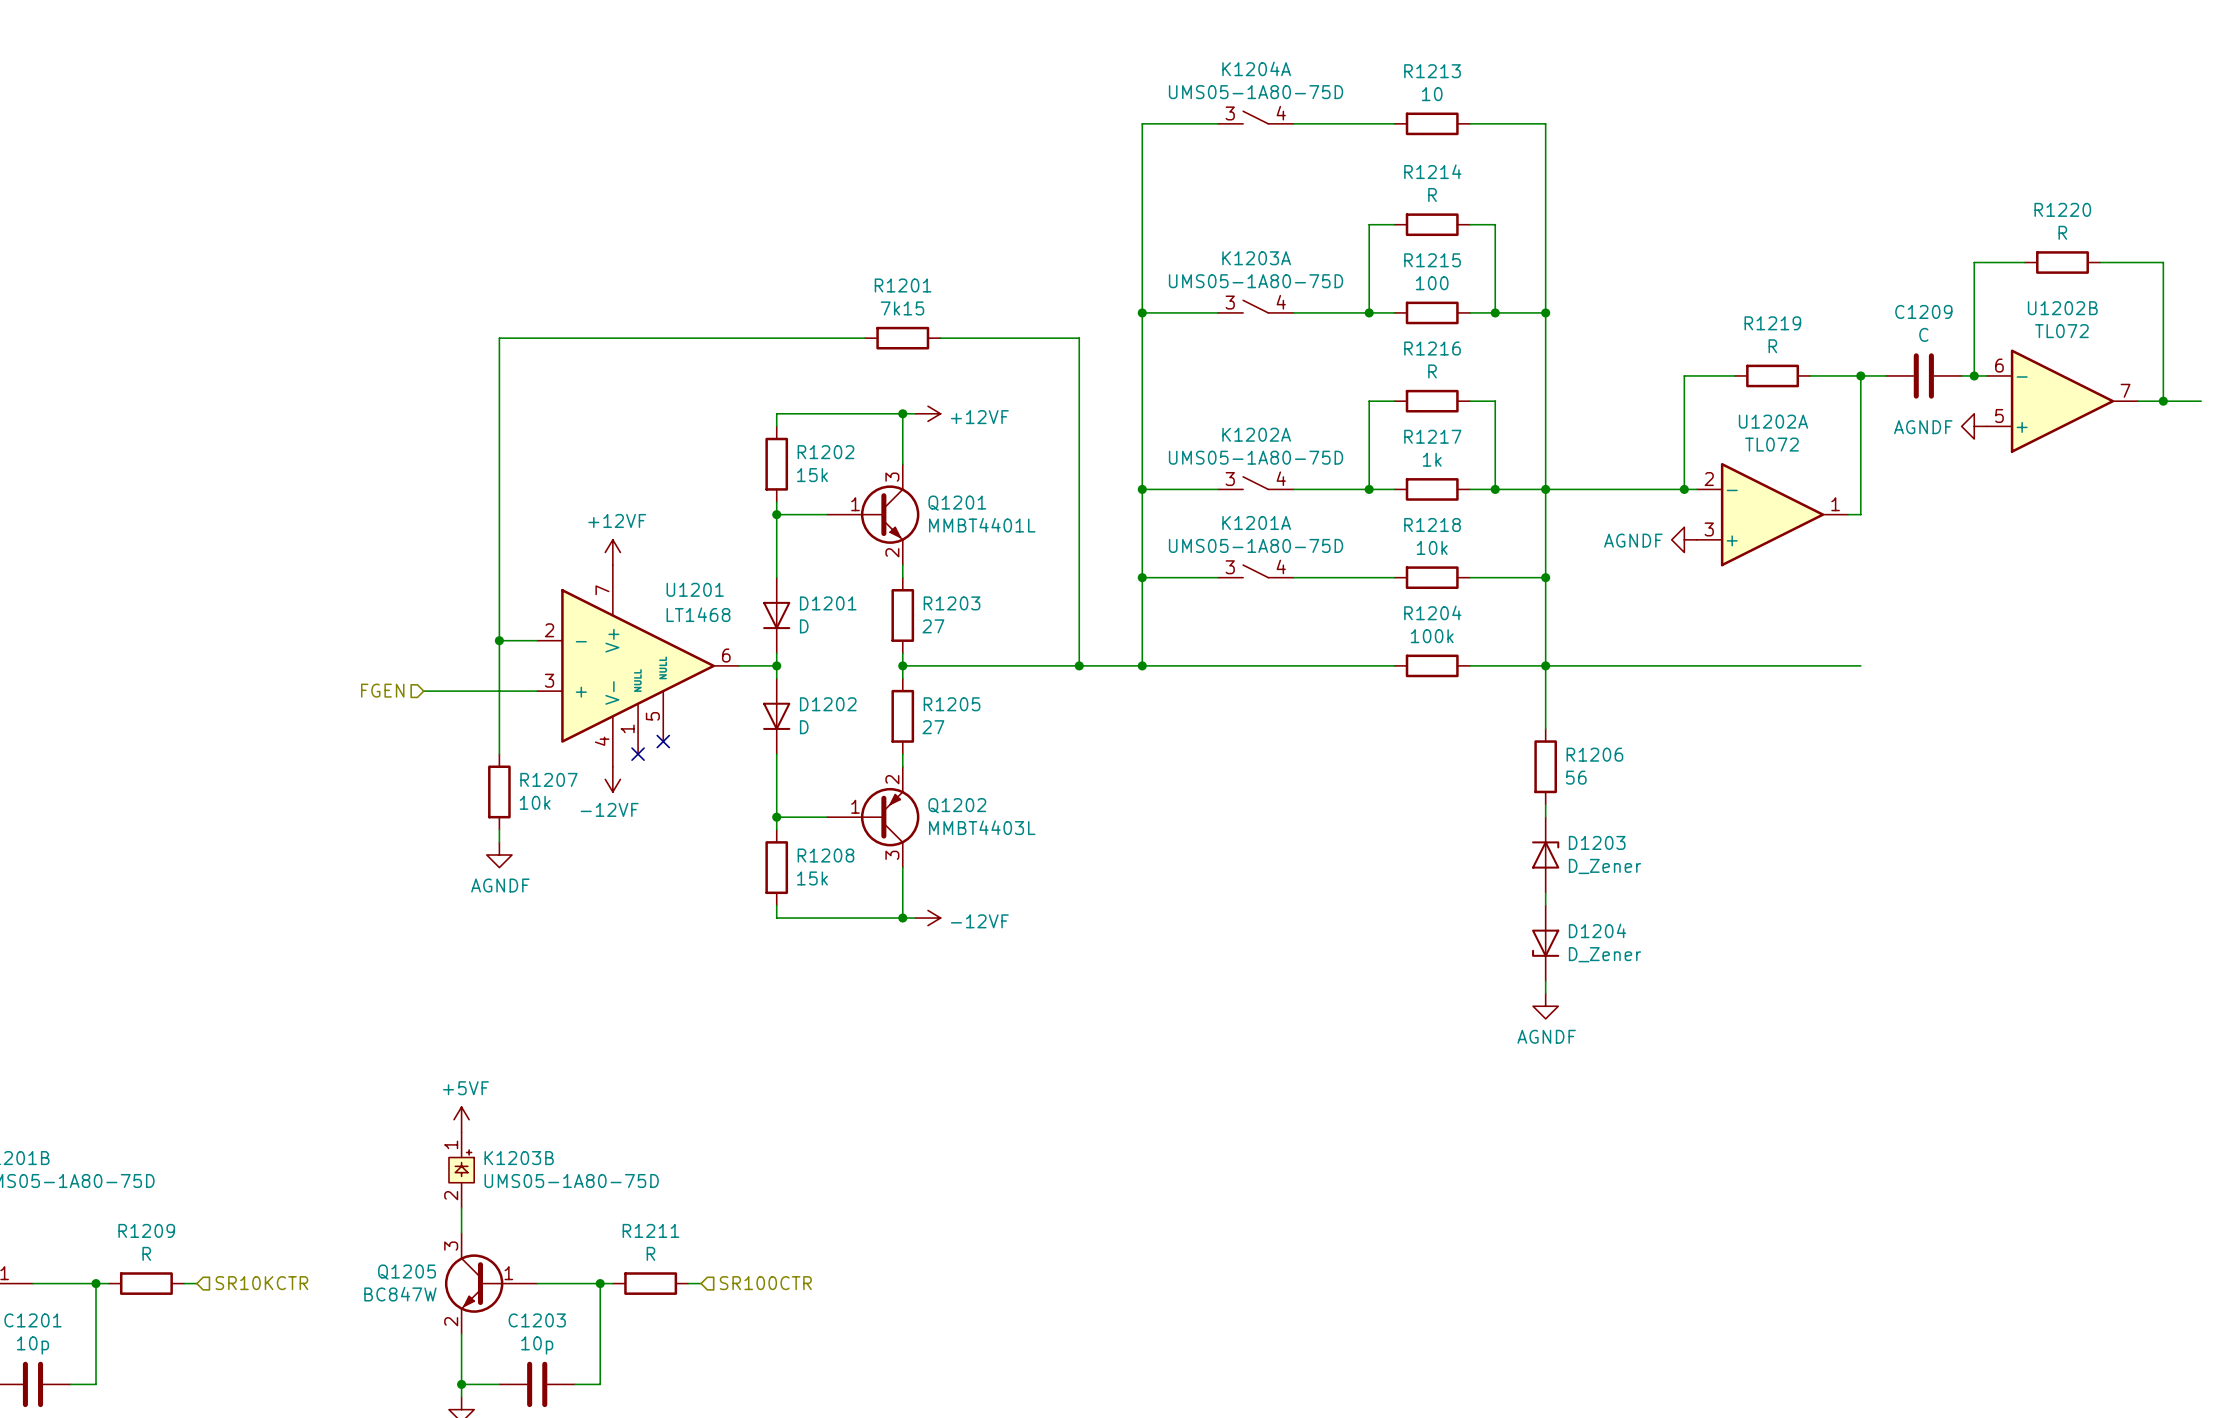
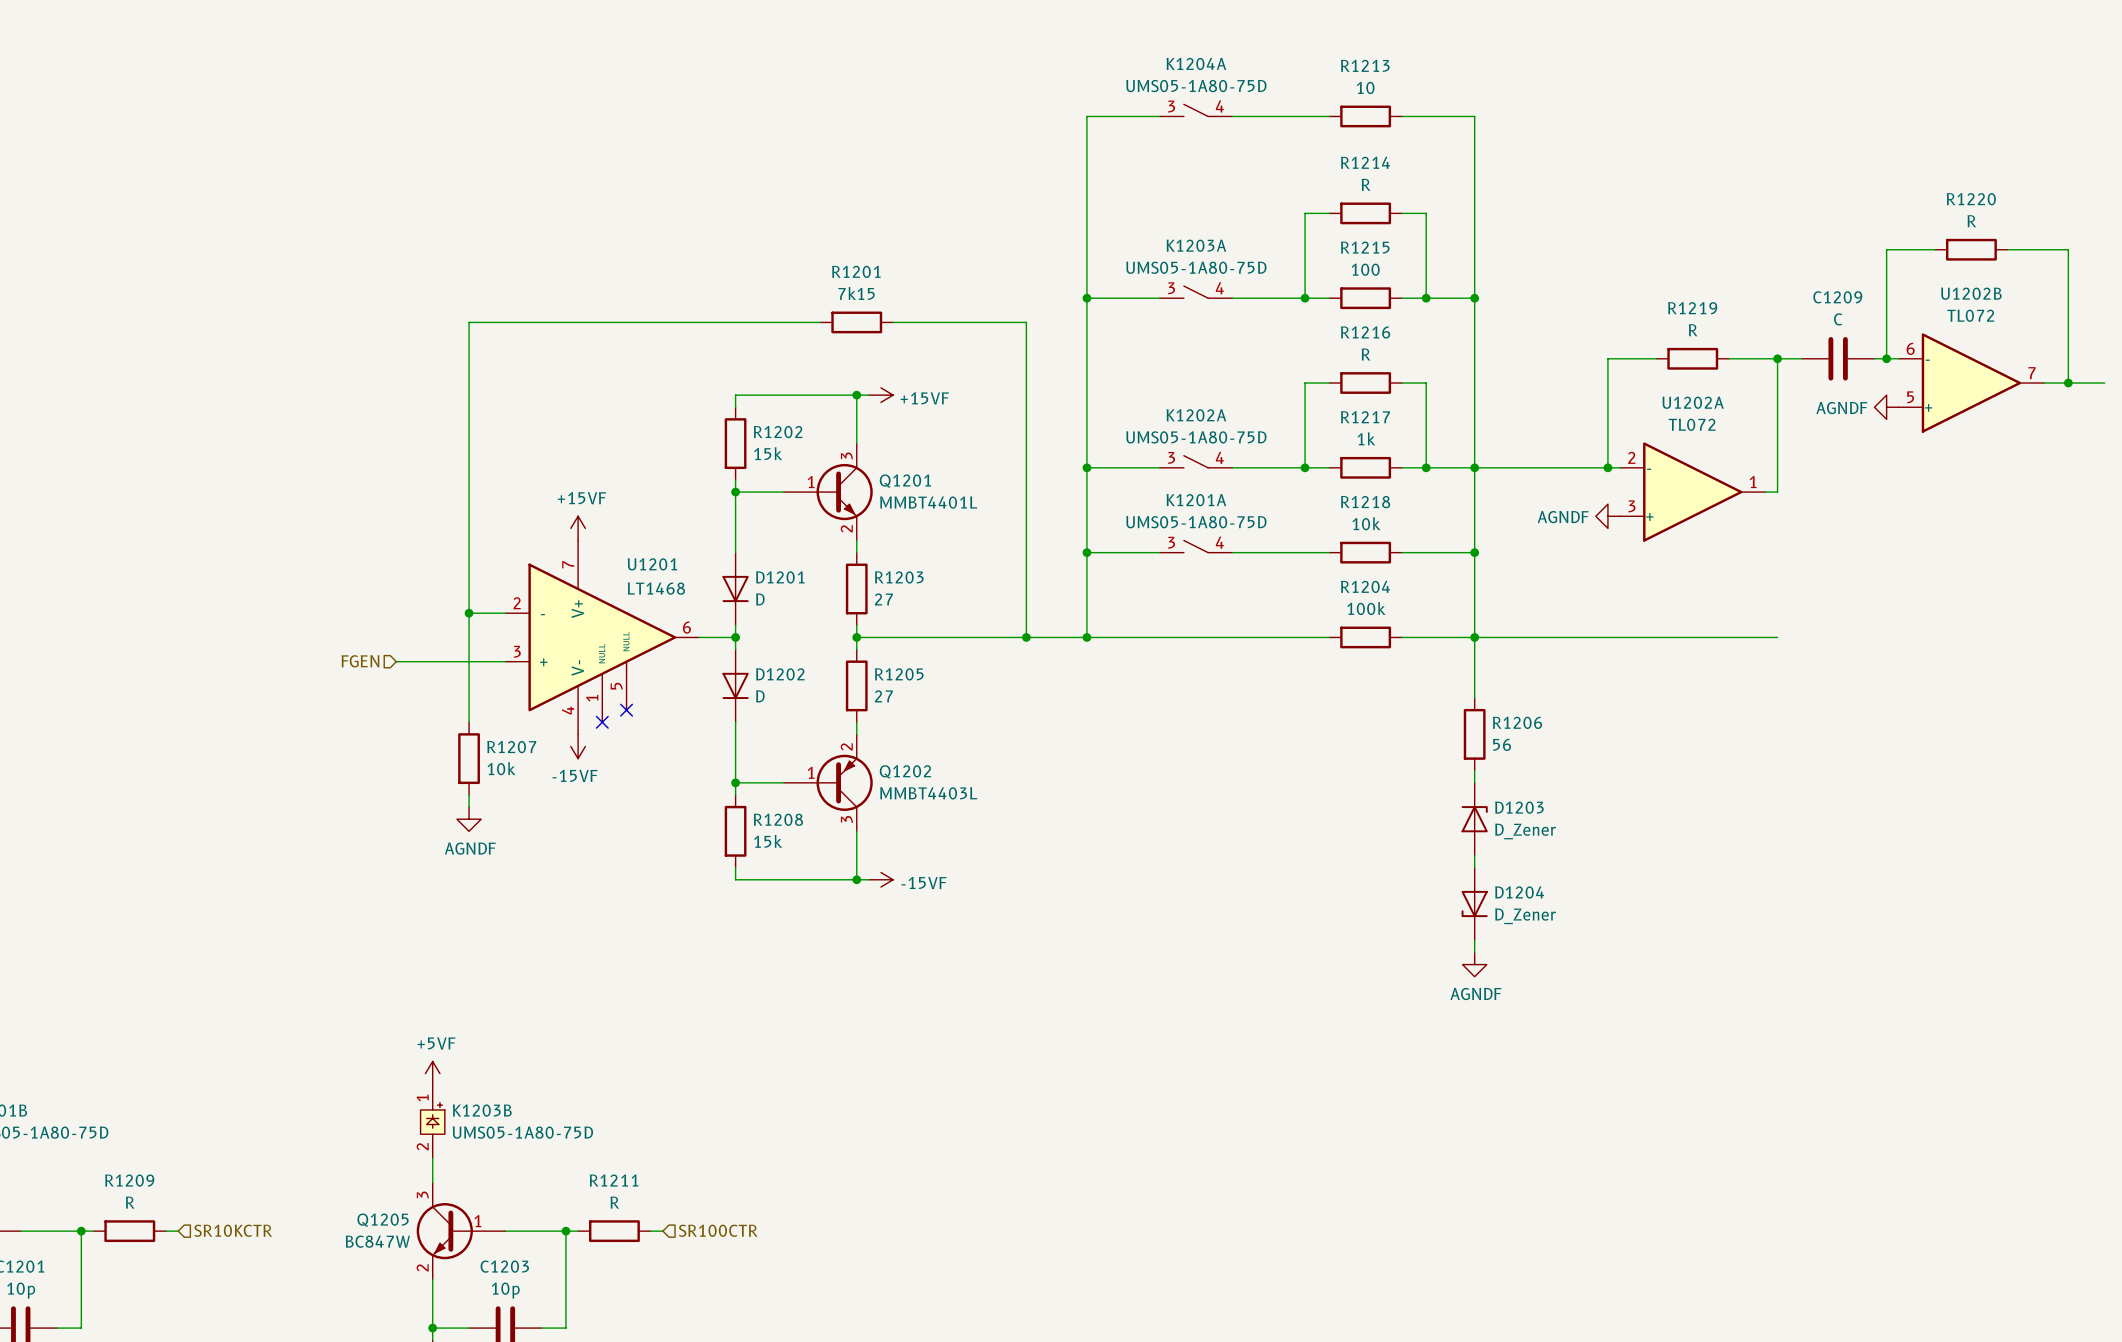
power symbol: +12VF (927, 413) -> +15VF (880, 395)
power symbol: +12VF (612, 552) -> +15VF (578, 528)
power symbol: -12VF (612, 779) -> -15VF (578, 746)
power symbol: -12VF (927, 918) -> -15VF (880, 879)

